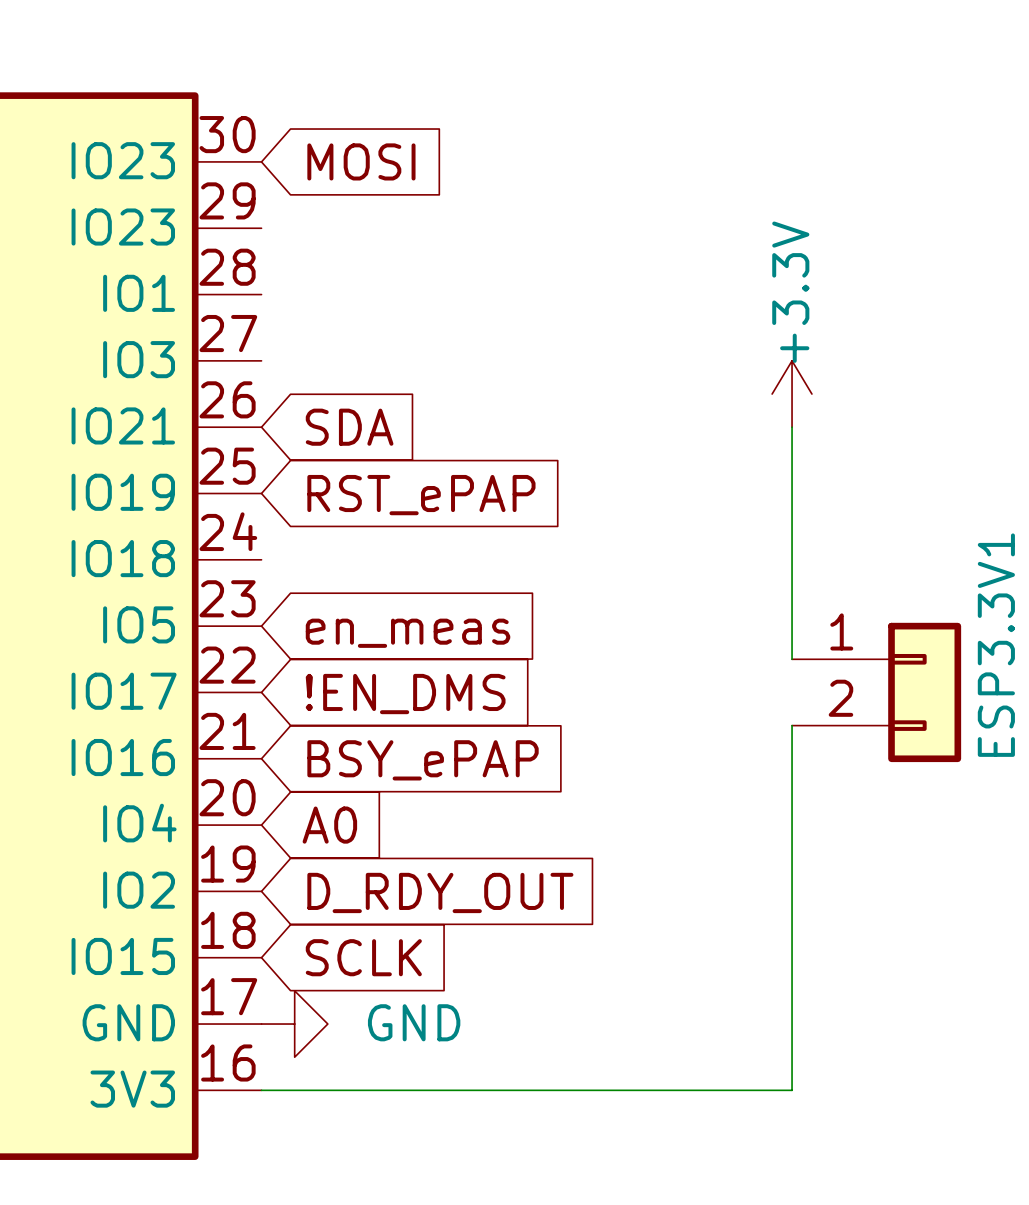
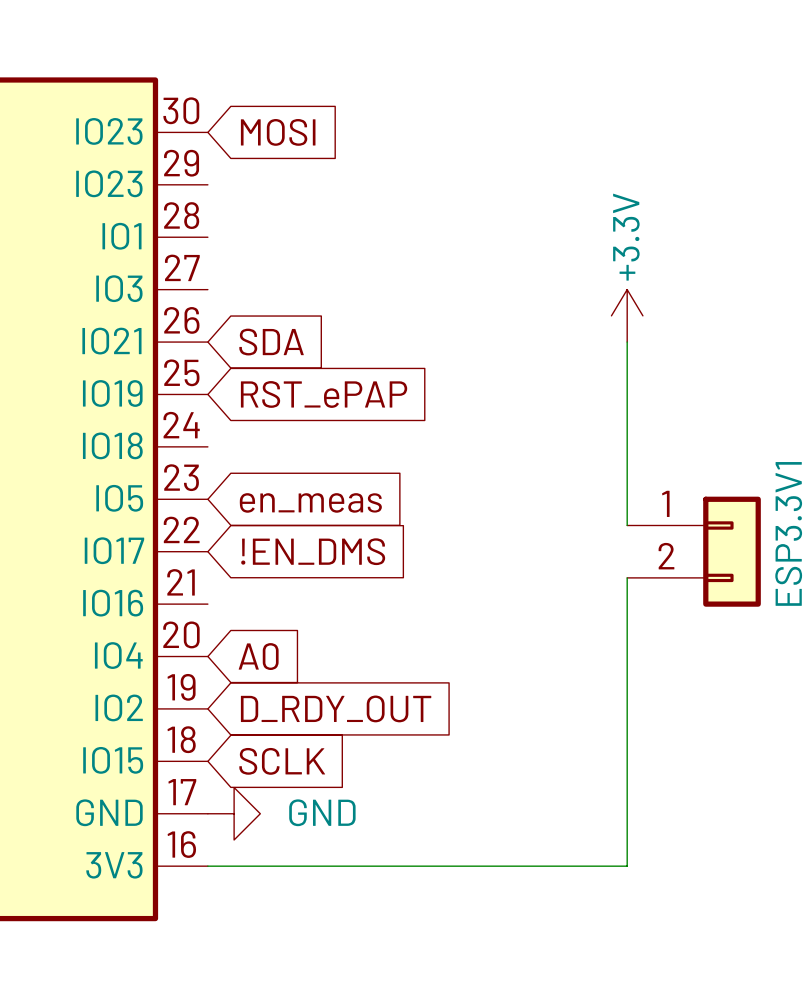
global label: BSY_ePAP (423, 760) -> none

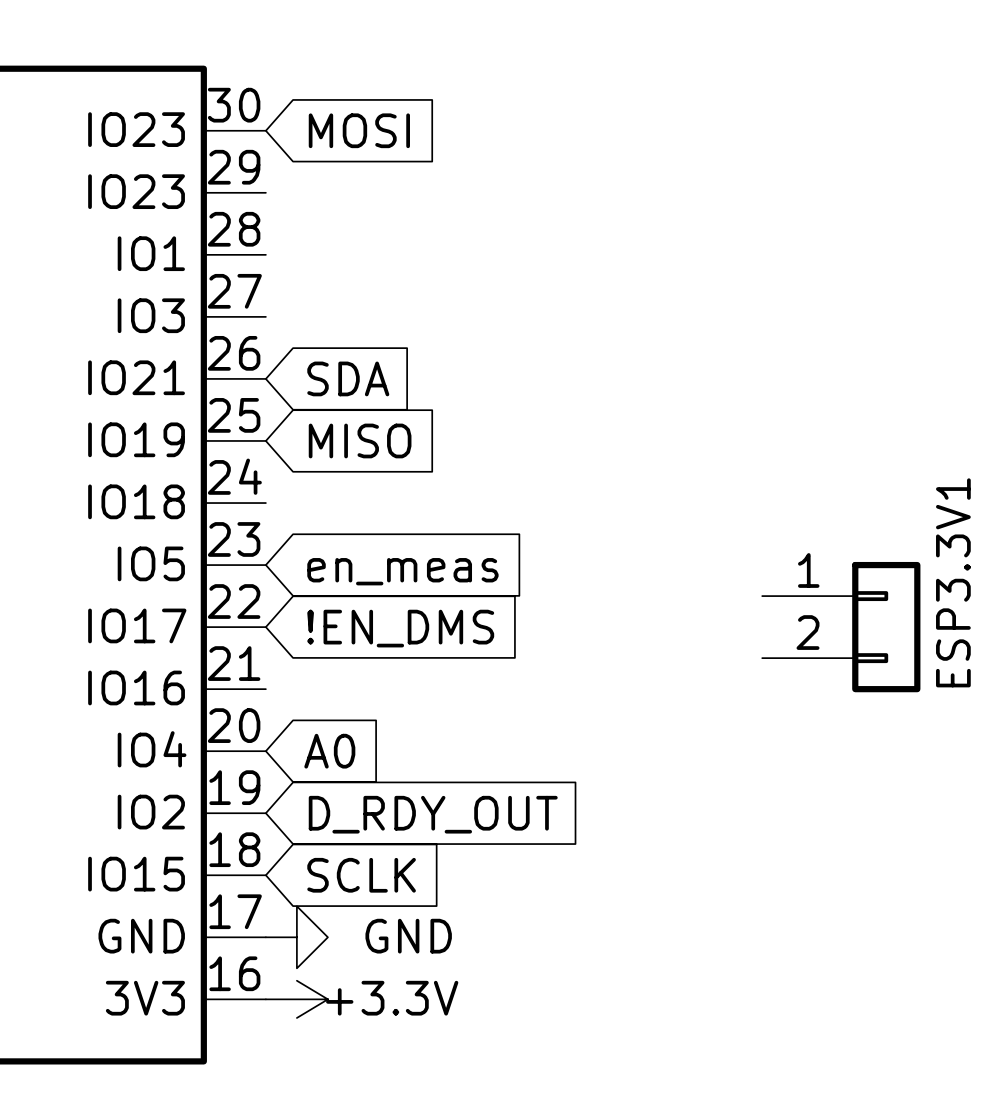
power symbol: +3.3V (627, 315) -> none
wire: (627, 342) (627, 525) -> none
global label: RST_ePAP (324, 394) -> MISO (360, 440)
wire: (627, 577) (627, 866) (207, 866) -> none
power symbol: none -> +3.3V (296, 999)

